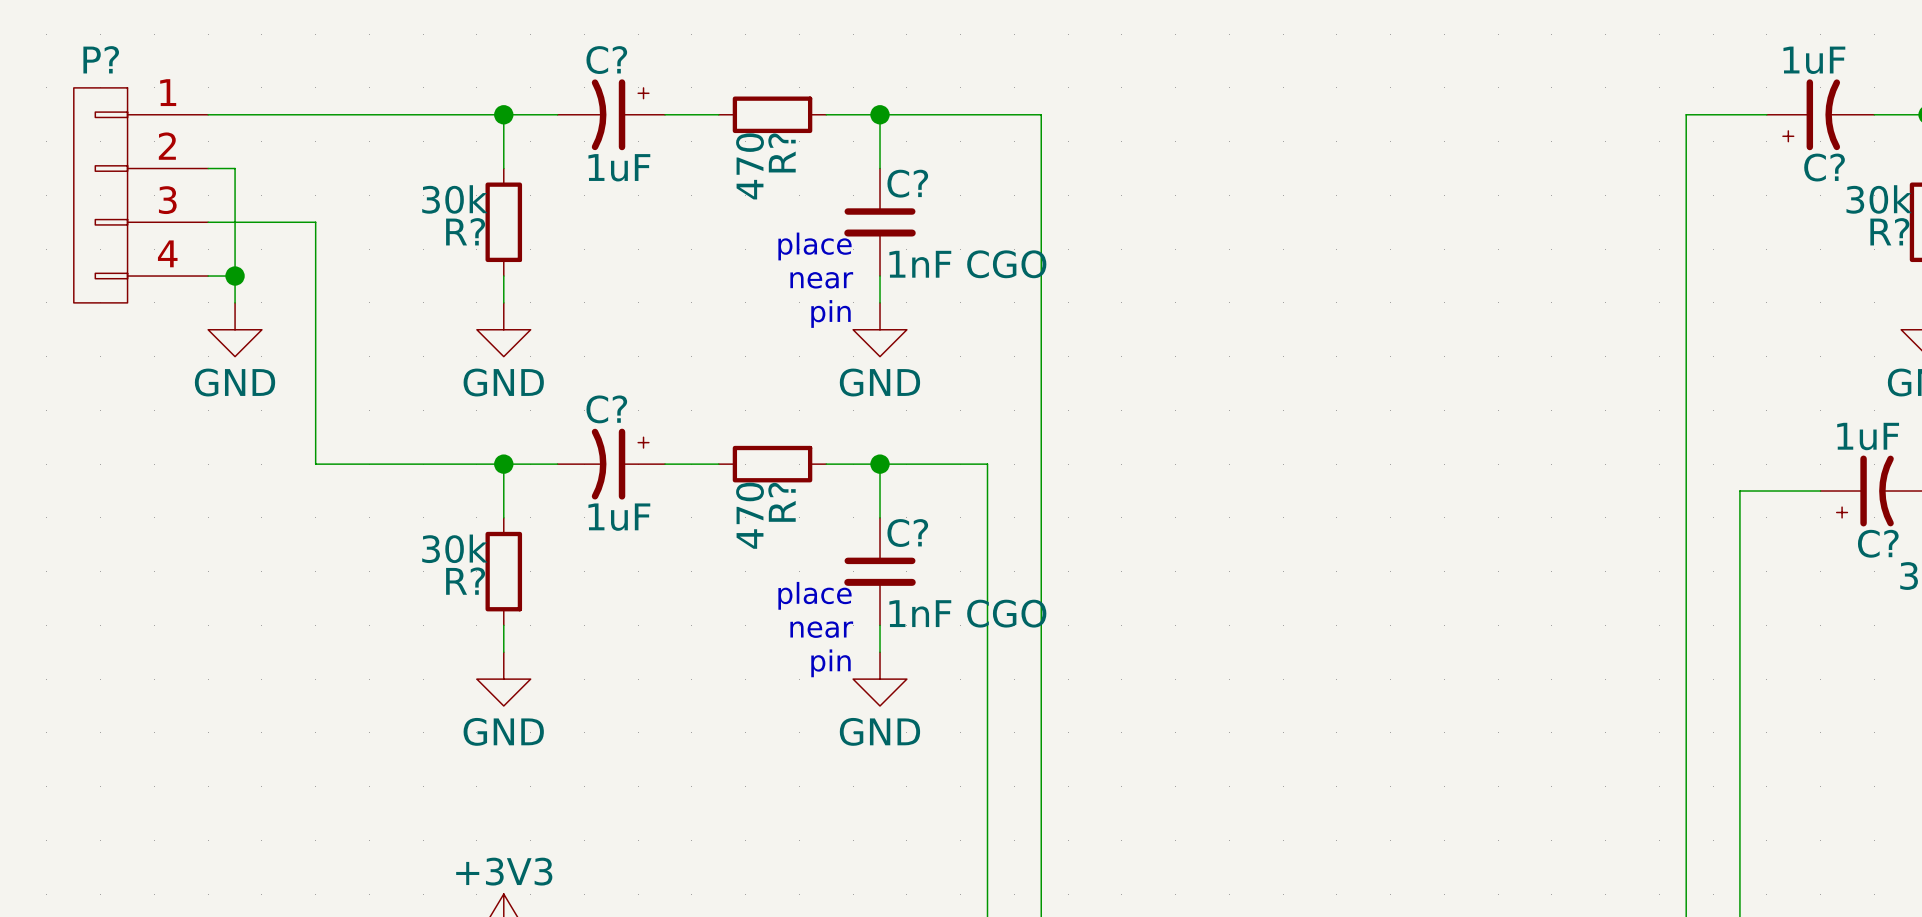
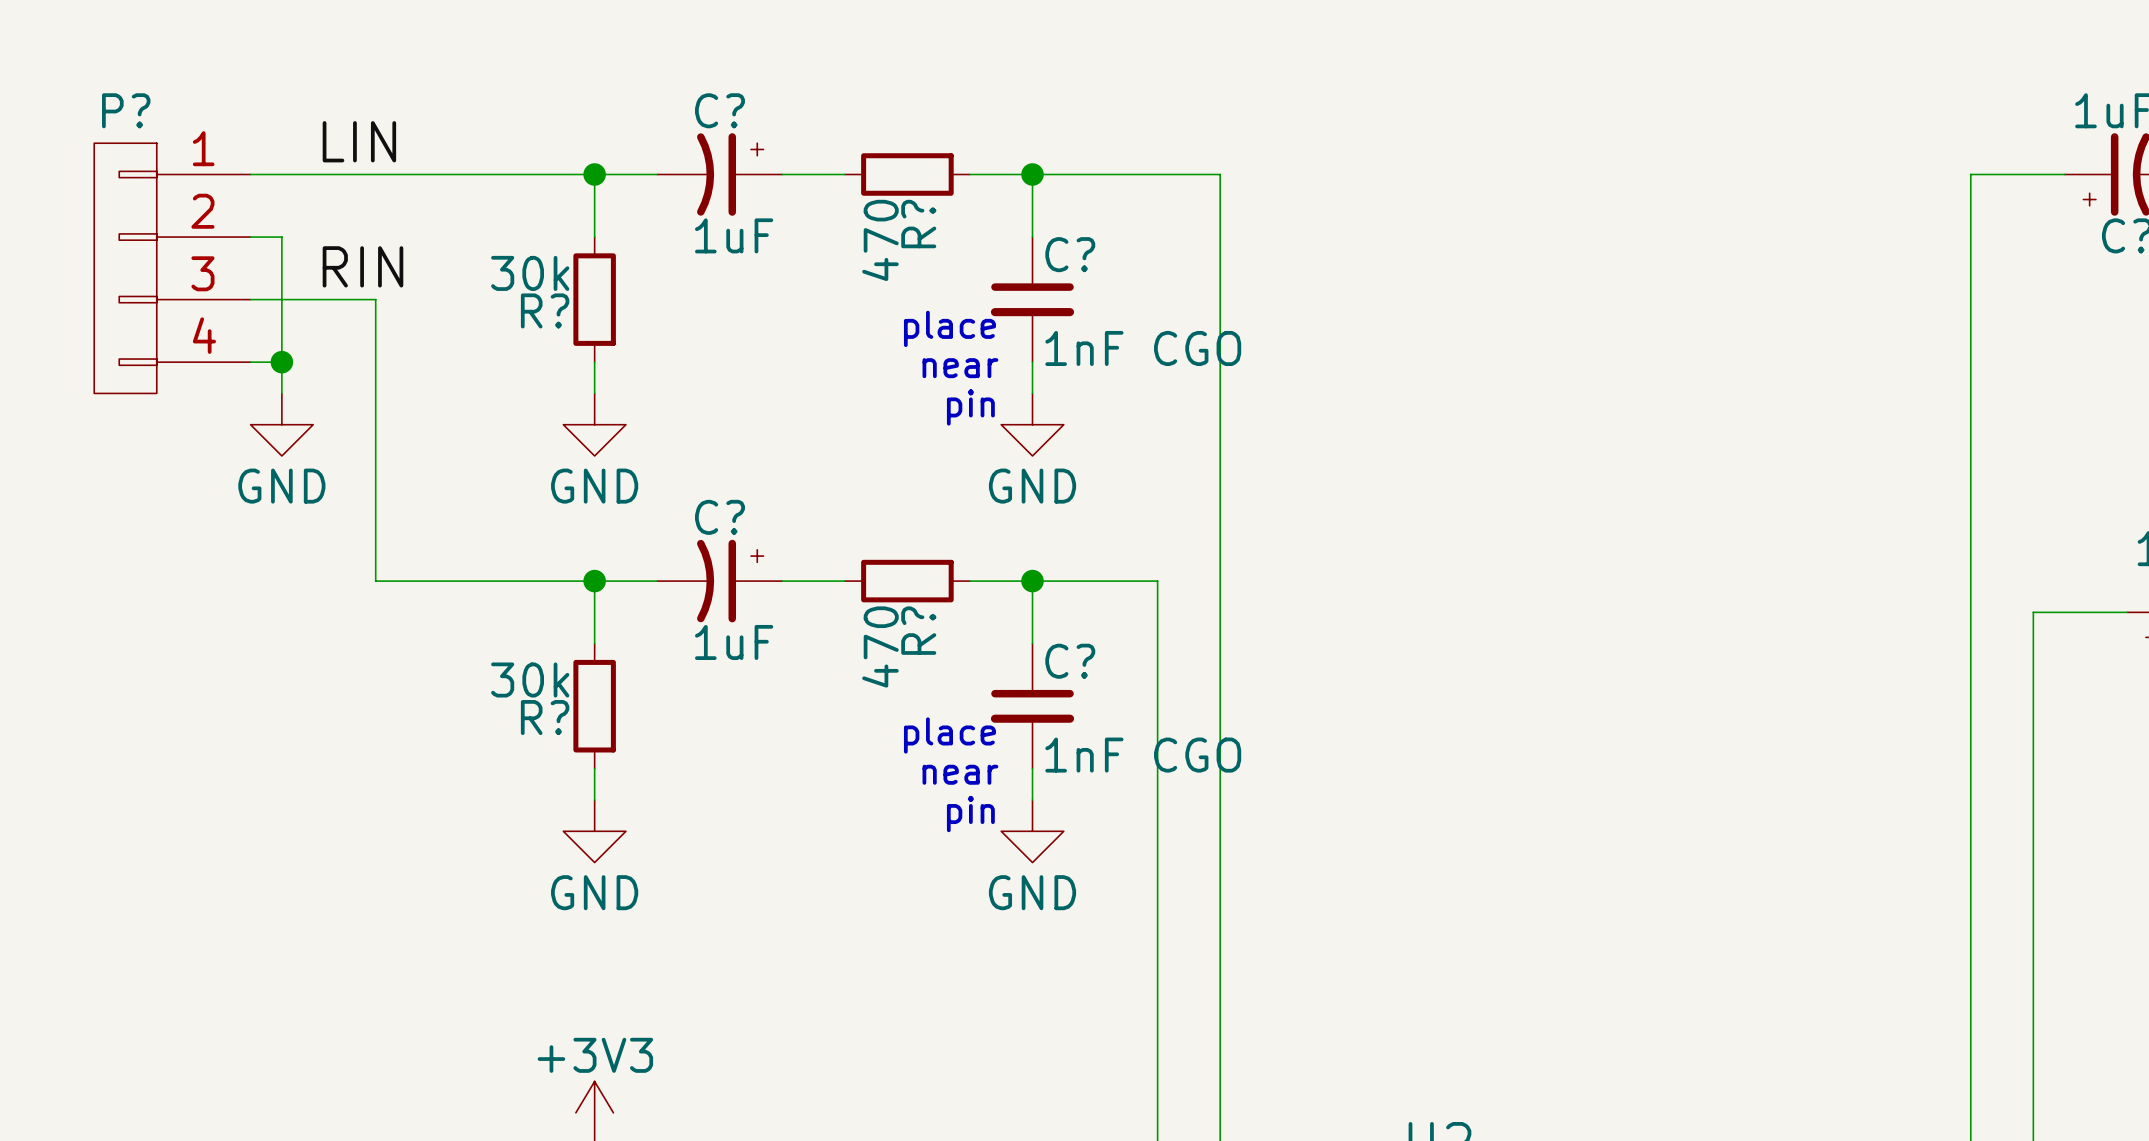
label: none -> LIN (359, 141)
label: none -> RIN (362, 266)

